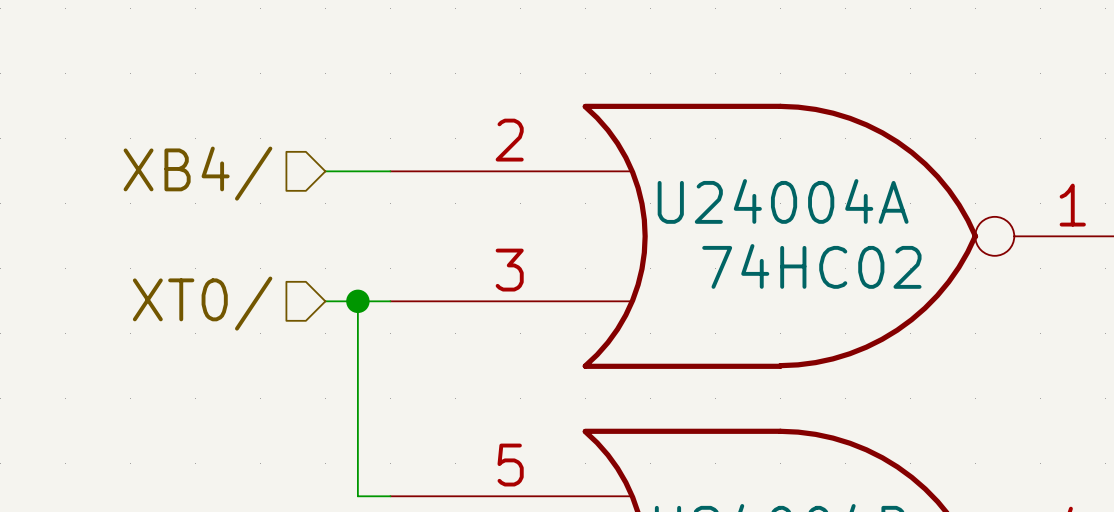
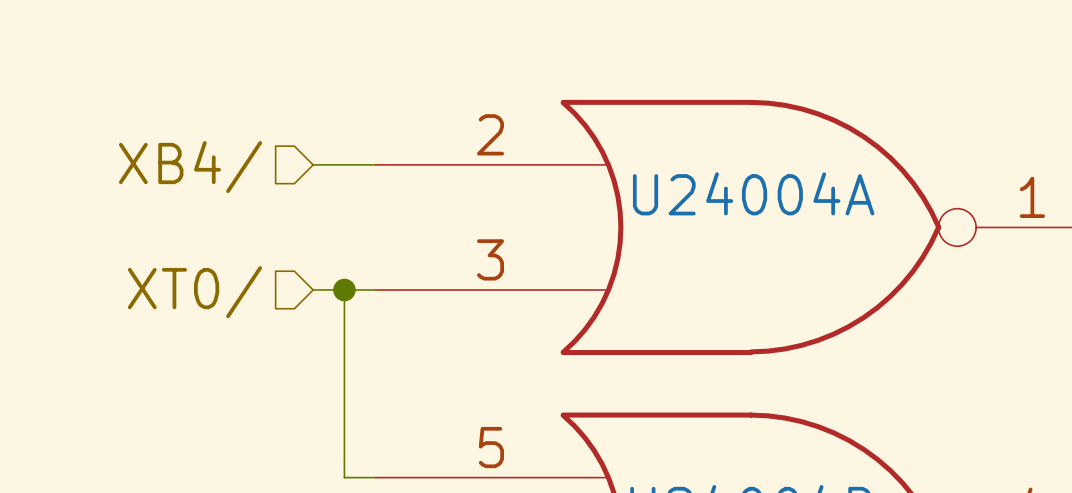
U24004A value: 74HC02 (811, 266) -> none

